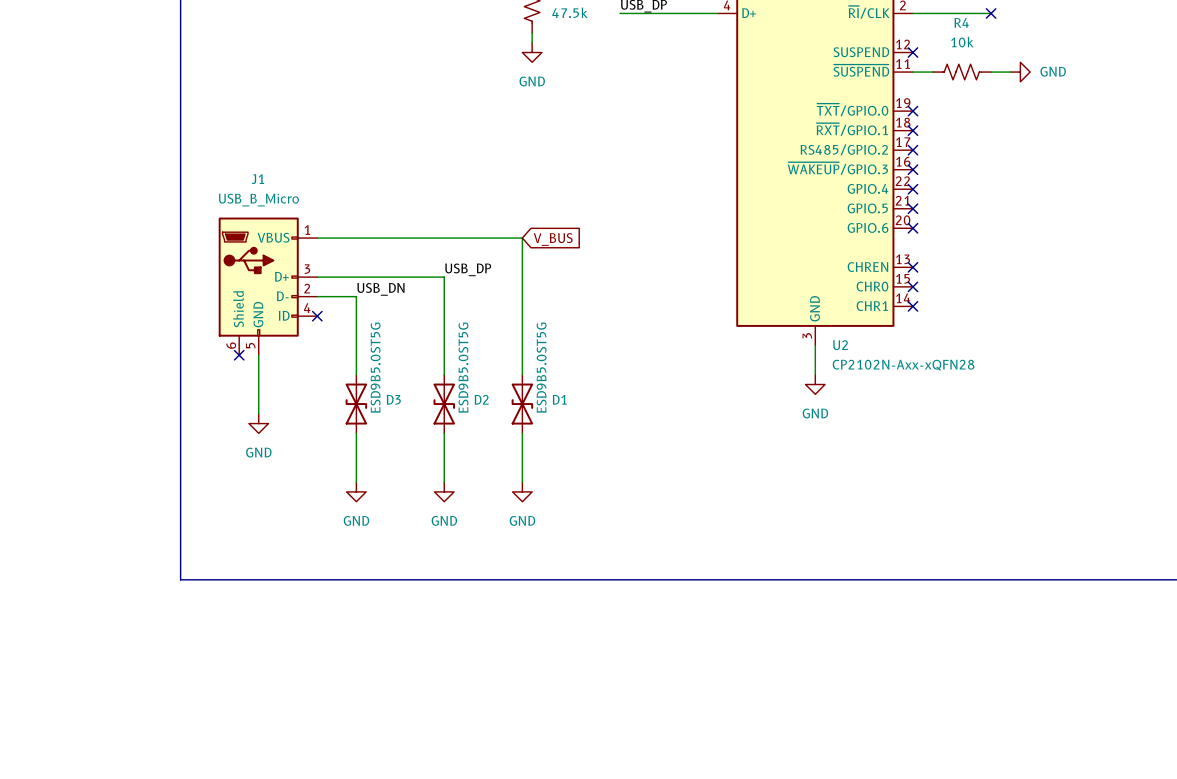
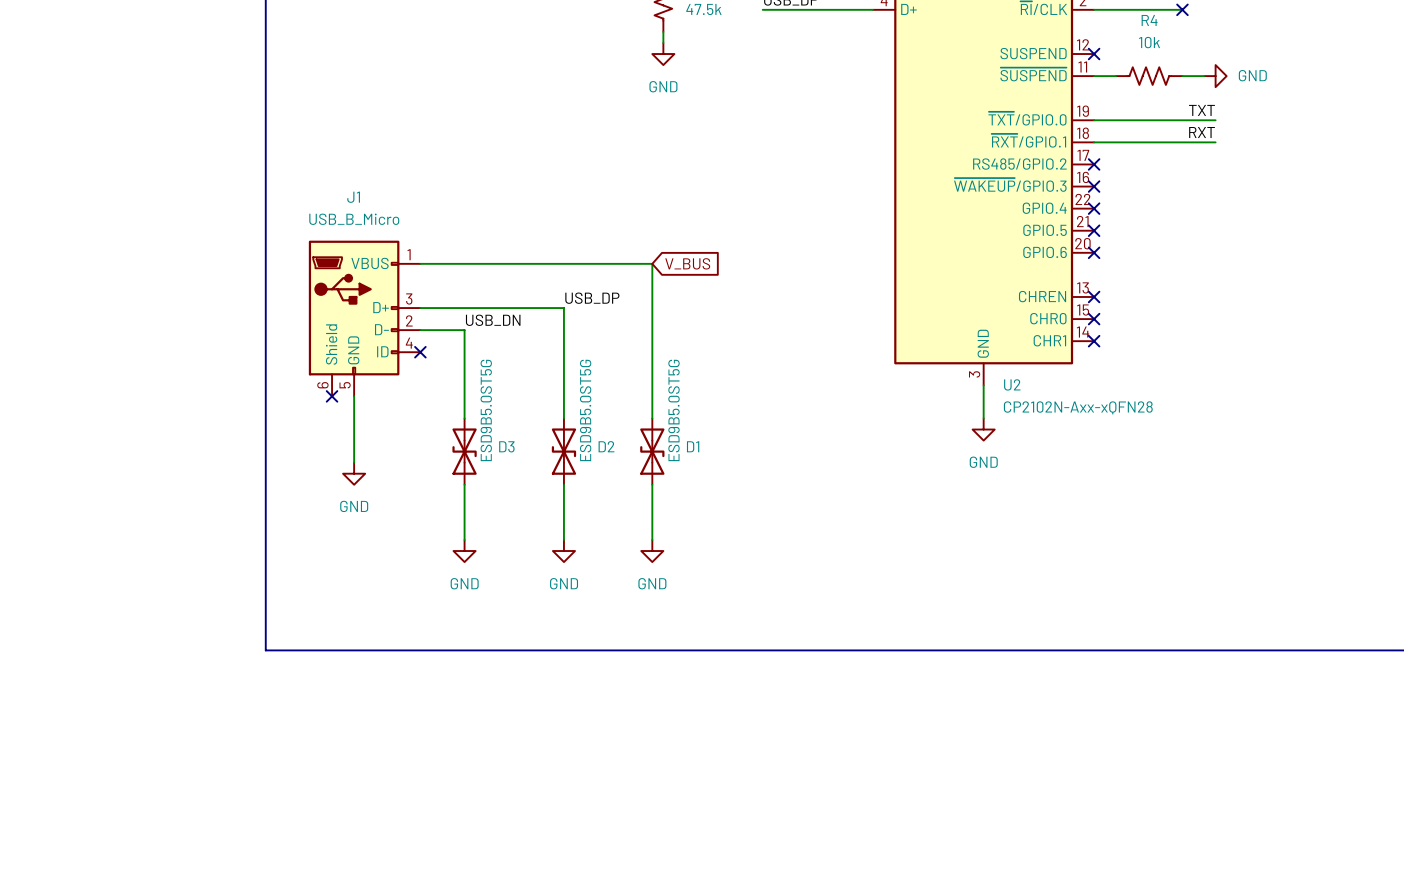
label: none -> TXT (1201, 110)
wire: none -> (1094, 120) (1215, 120)
no-connect mark: (912, 111) -> none
label: none -> RXT (1202, 132)
wire: none -> (1094, 142) (1215, 142)
no-connect mark: (912, 130) -> none

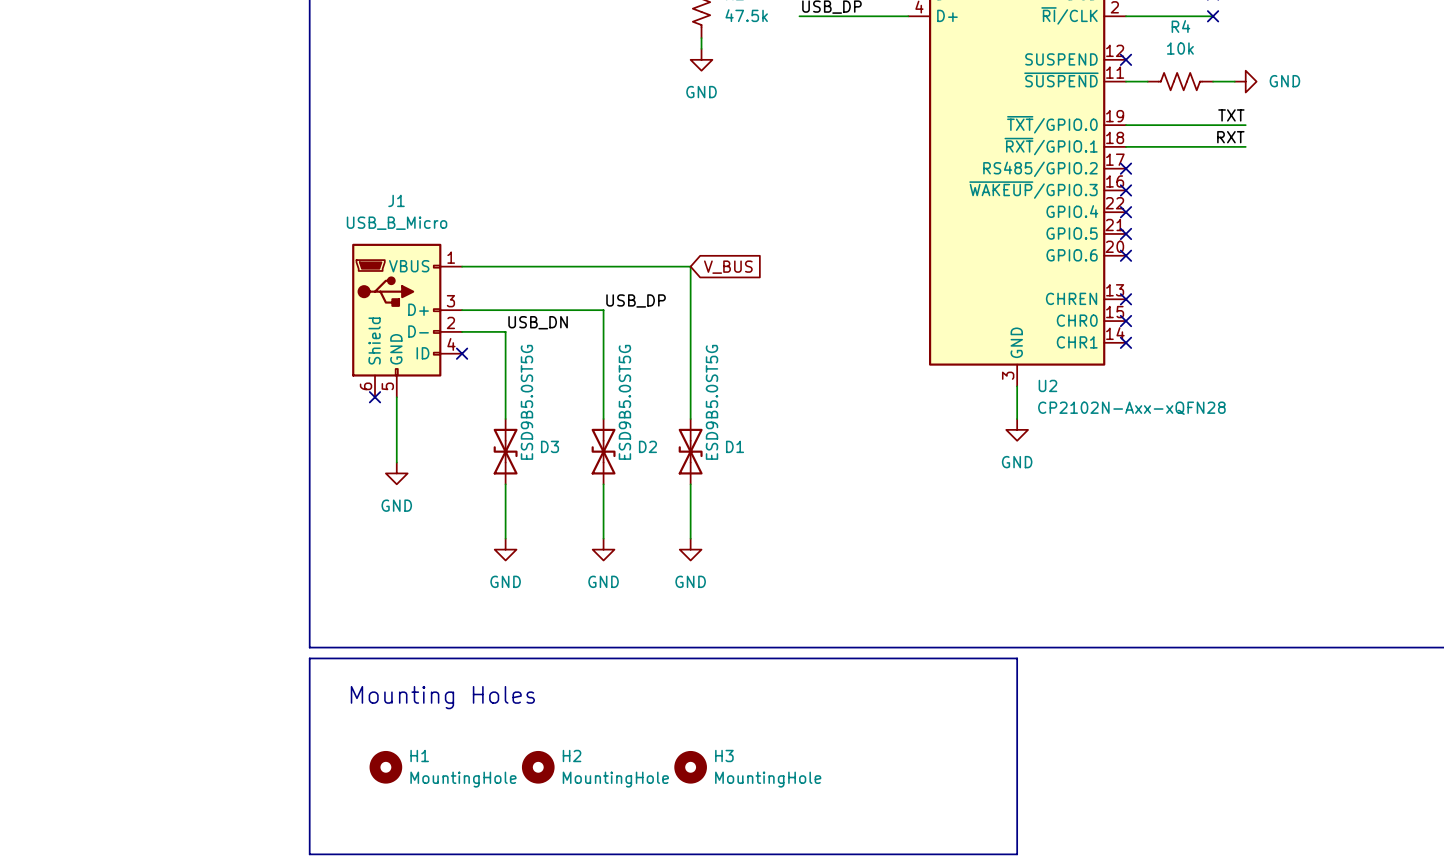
line: none -> (309, 658) (1017, 658) (1017, 854) (309, 854) (309, 658)
text: none -> Mounting Holes (442, 697)
H1: none -> MountingHole (385, 767)
H2: none -> MountingHole (538, 767)
H3: none -> MountingHole (690, 767)

